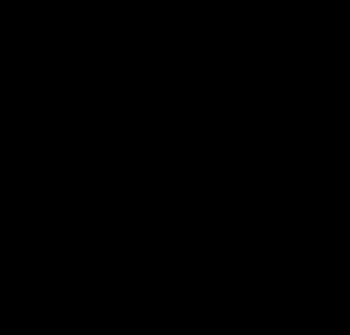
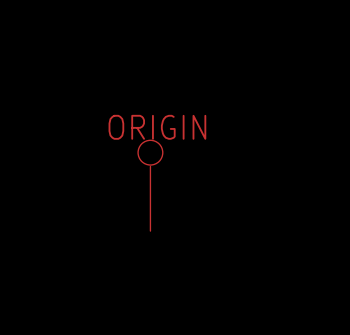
ORIGIN: none -> (150, 185)

